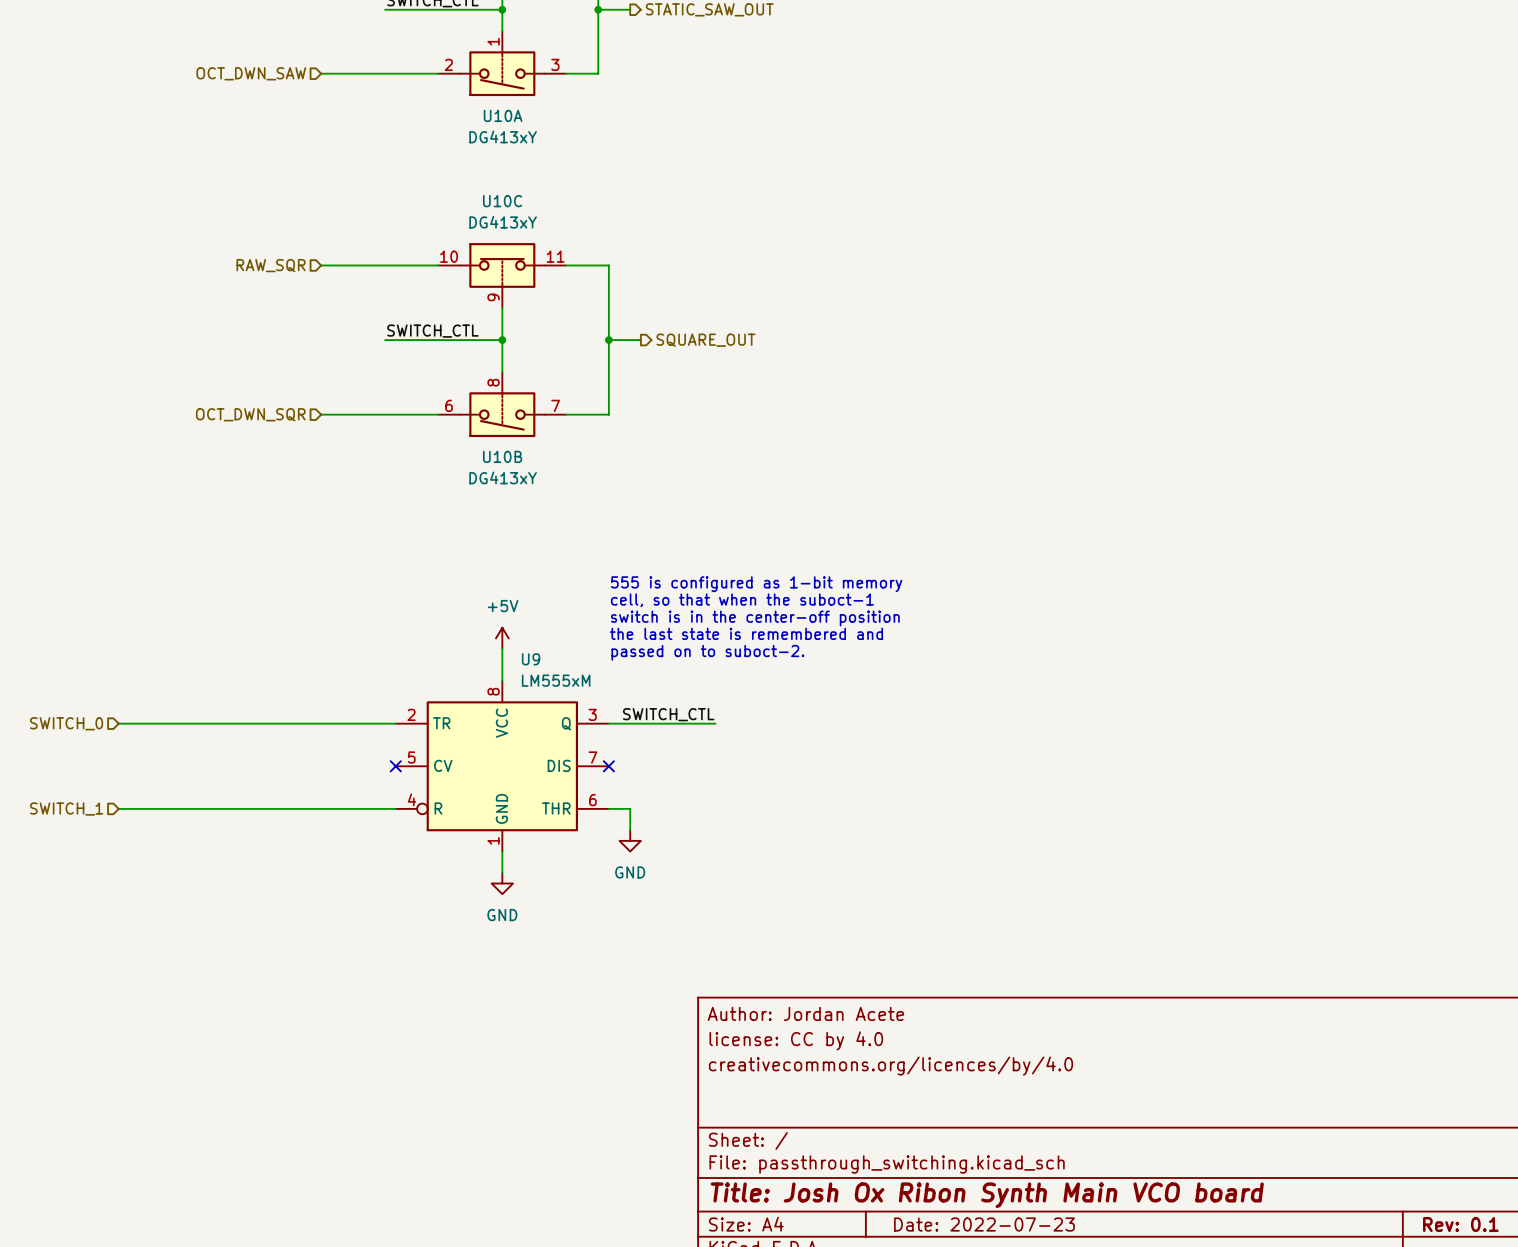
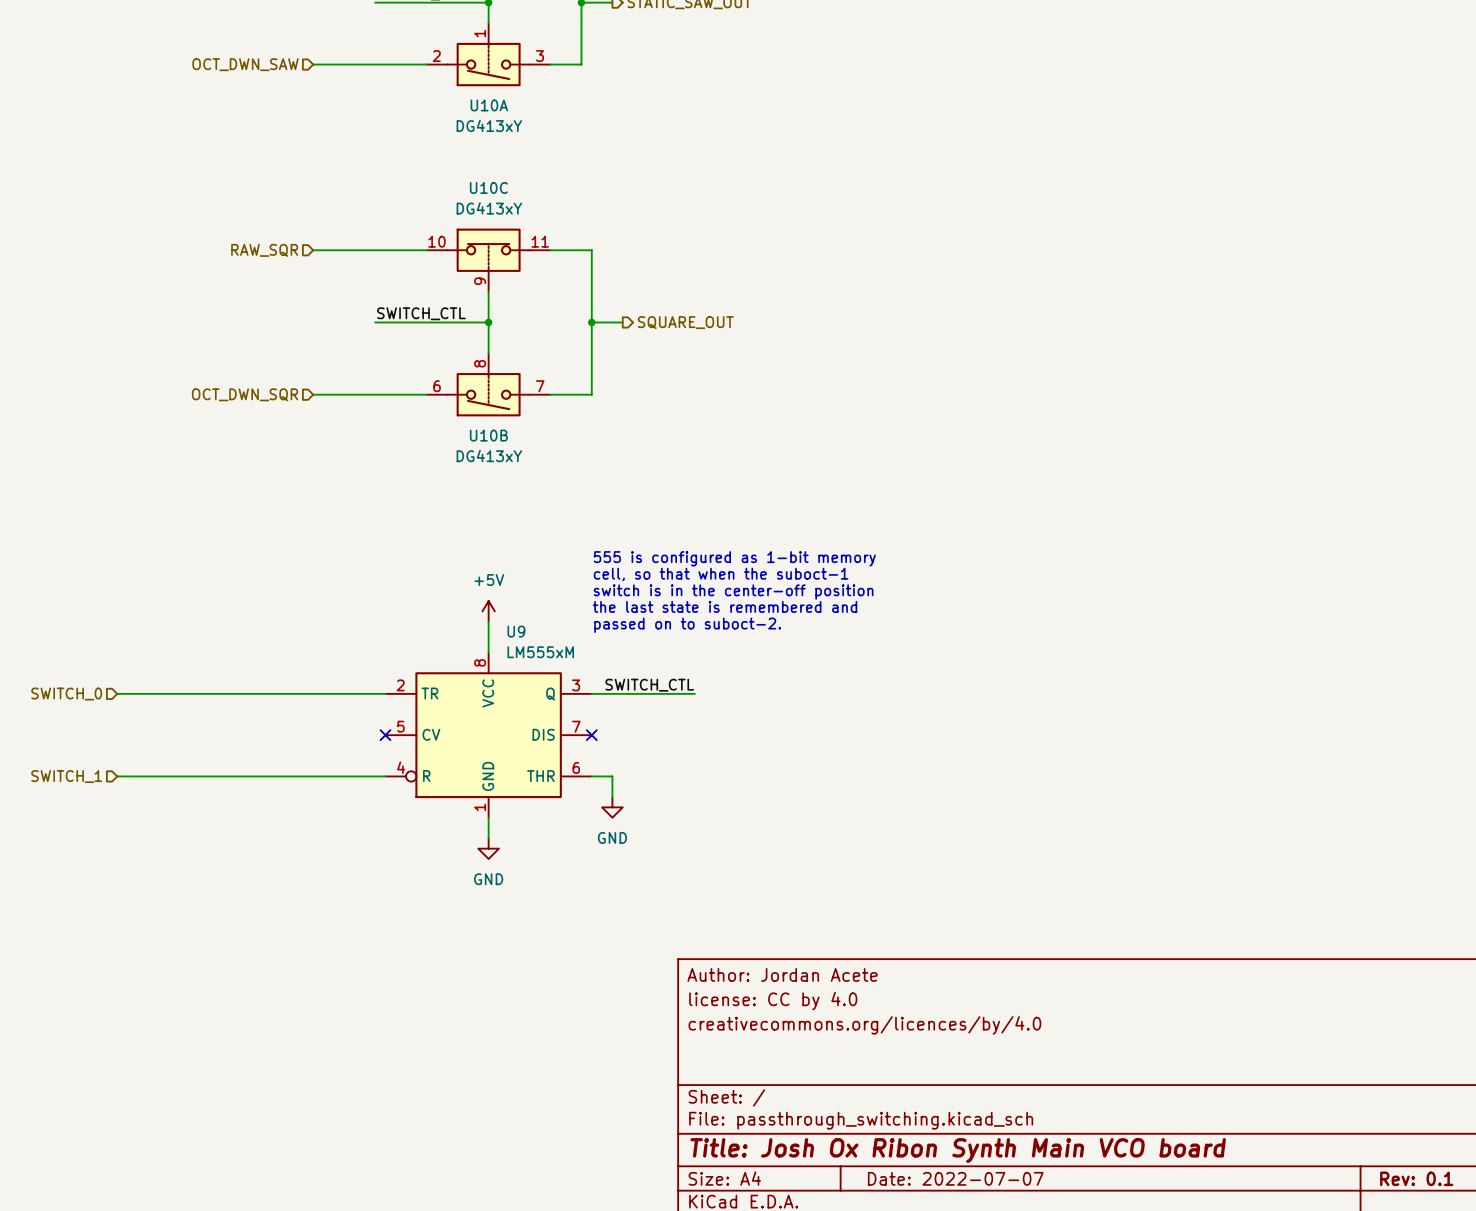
title block: Date: 2022-07-23 (984, 1224) -> Date: 2022-07-07 (955, 1178)

